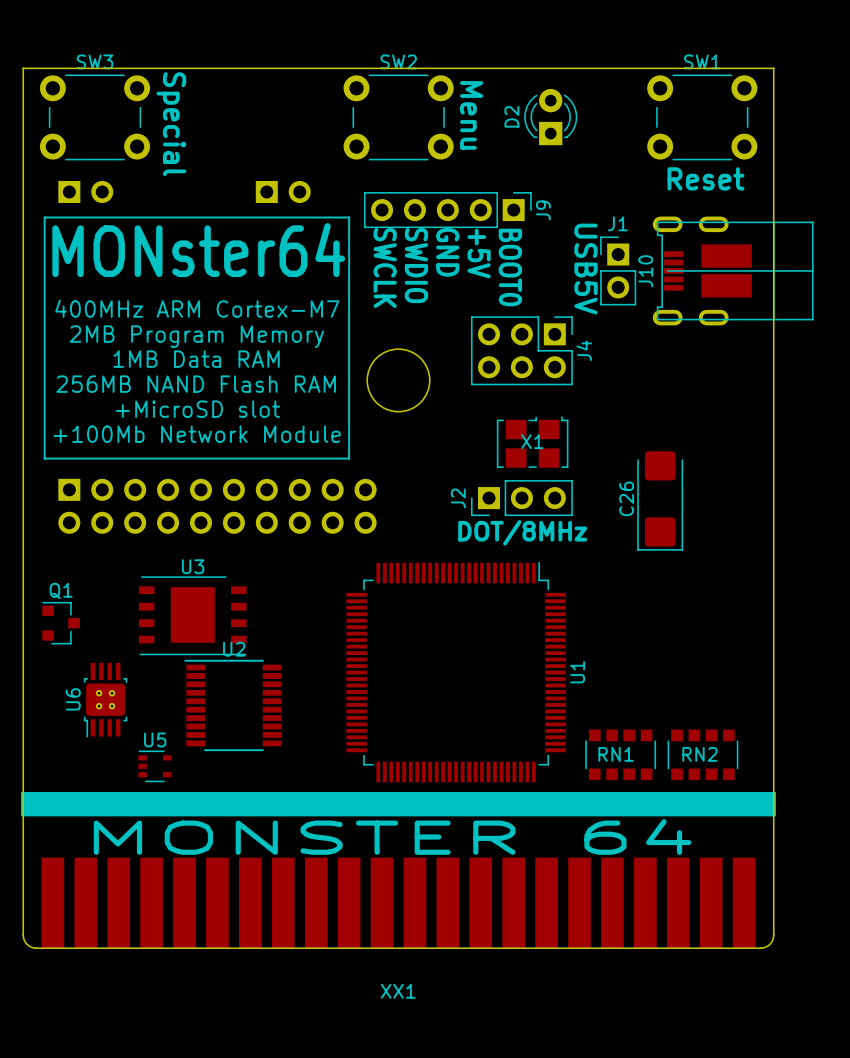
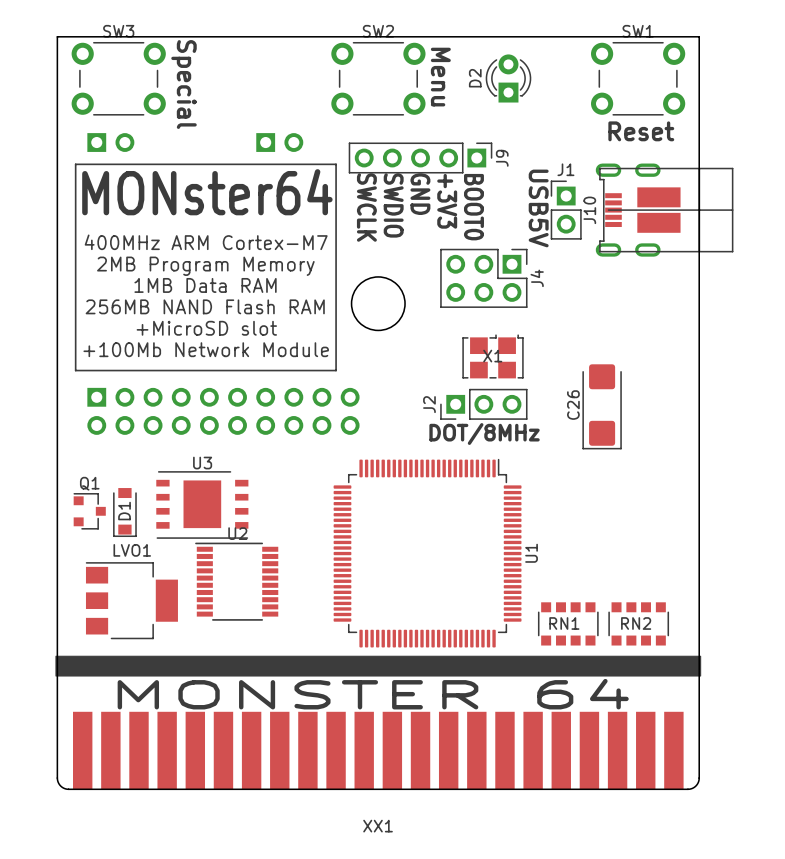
text: +5V (479, 253) -> +3V3 (447, 201)
D1: none -> (124, 512)
U6: (105, 700) -> none
LVO1: none -> (131, 600)
U5: (154, 766) -> none

